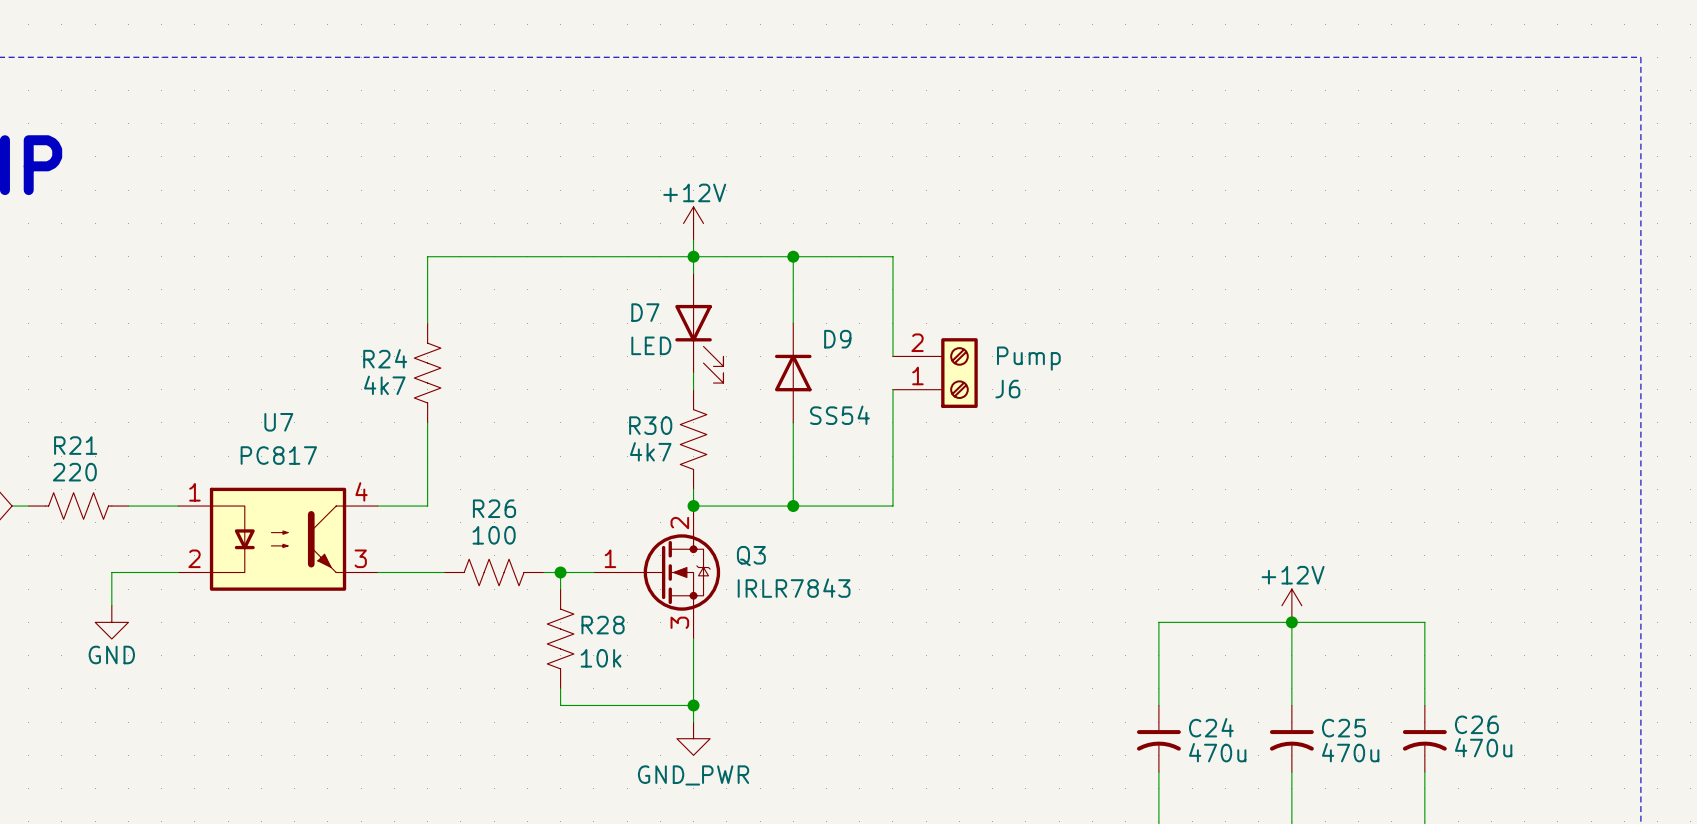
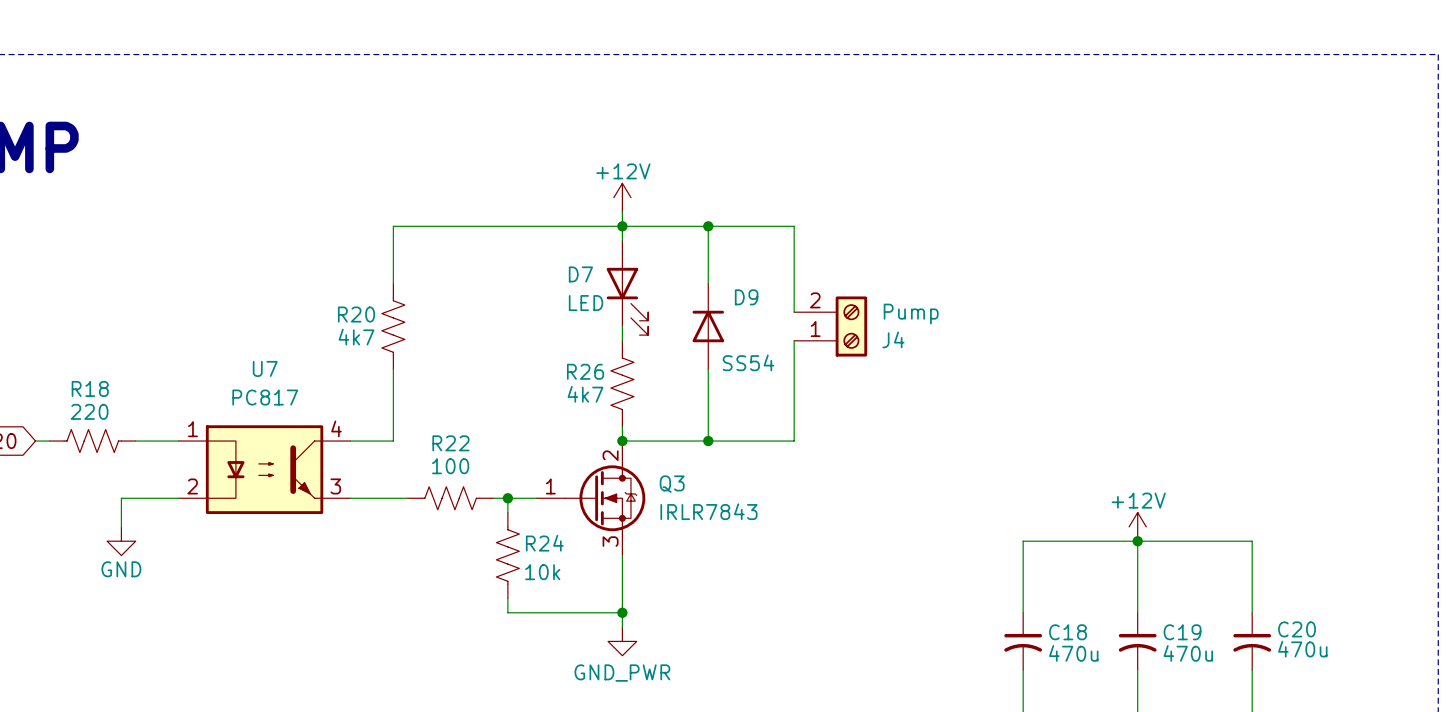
R24 name: R24 (385, 358) -> R20 (356, 314)
J6 name: J6 (1007, 389) -> J4 (893, 339)
R30 name: R30 (650, 425) -> R26 (585, 371)
R21 name: R21 (75, 445) -> R18 (90, 388)
R26 name: R26 (494, 508) -> R22 (450, 443)
R28 name: R28 (603, 625) -> R24 (544, 543)
C26 name: C26 (1476, 724) -> C20 (1297, 629)
C24 name: C24 (1211, 727) -> C18 (1068, 632)
C25 name: C25 (1343, 728) -> C19 (1182, 632)

